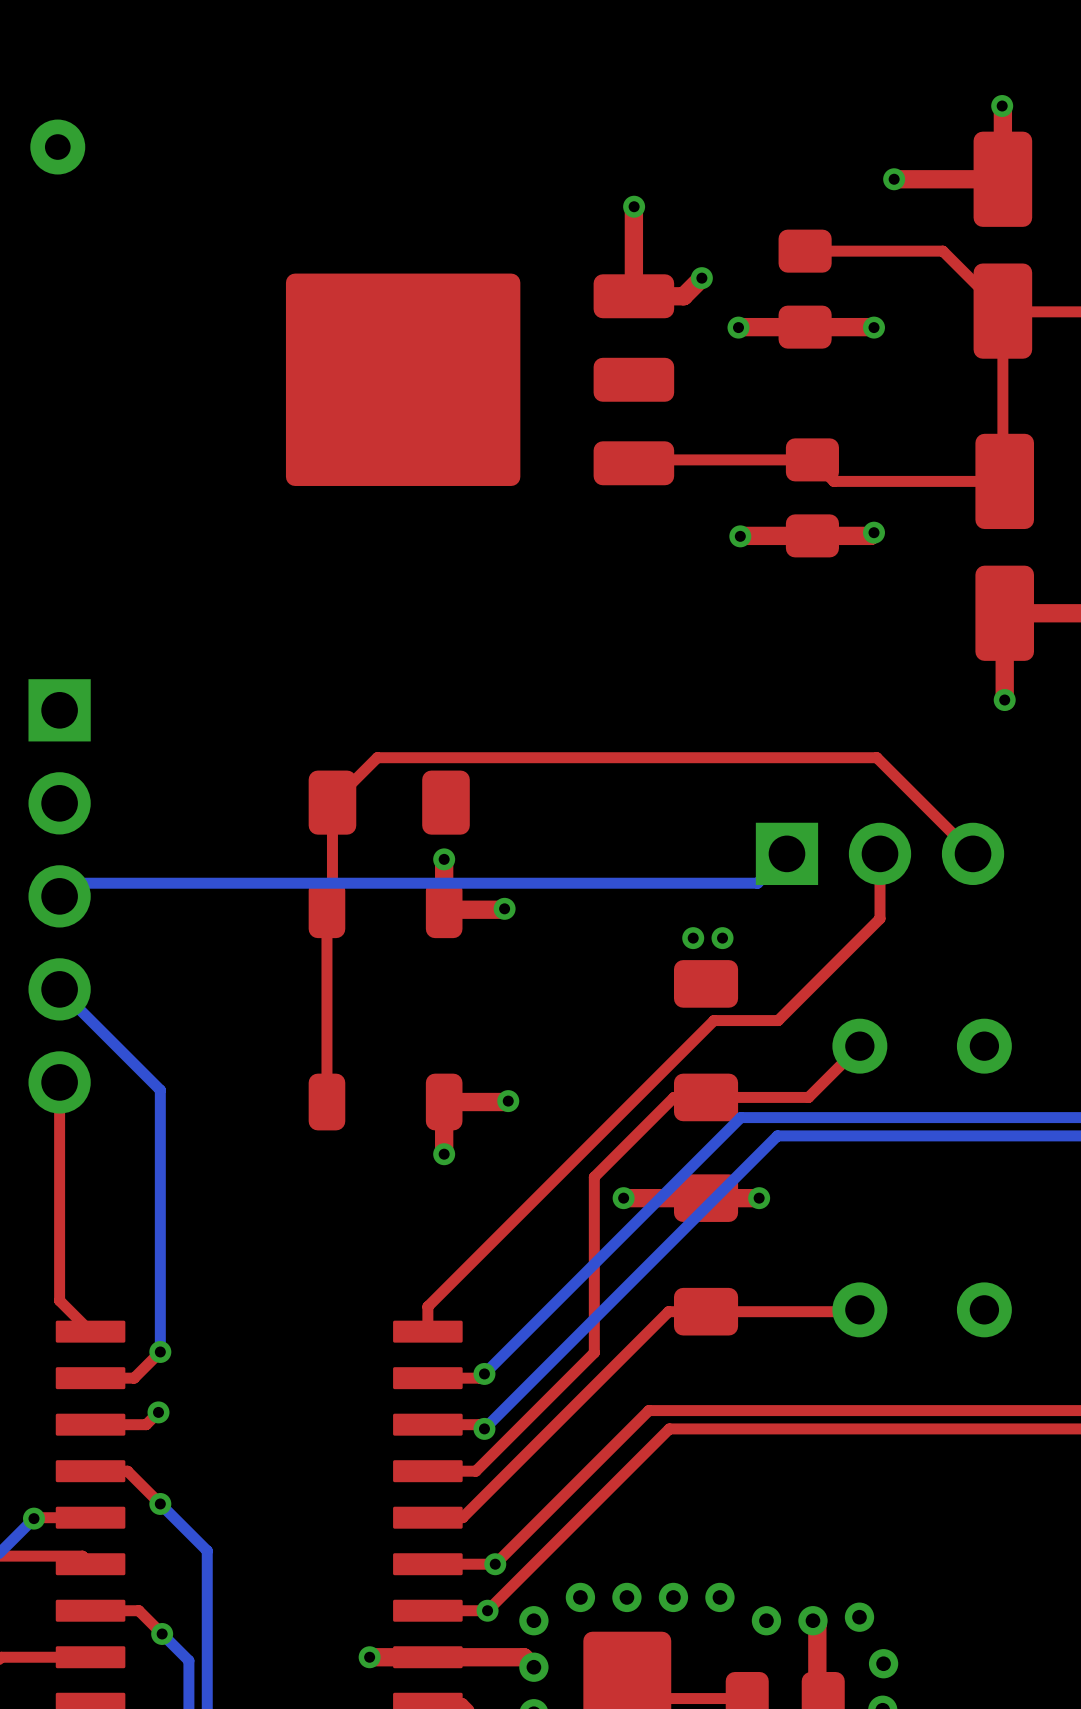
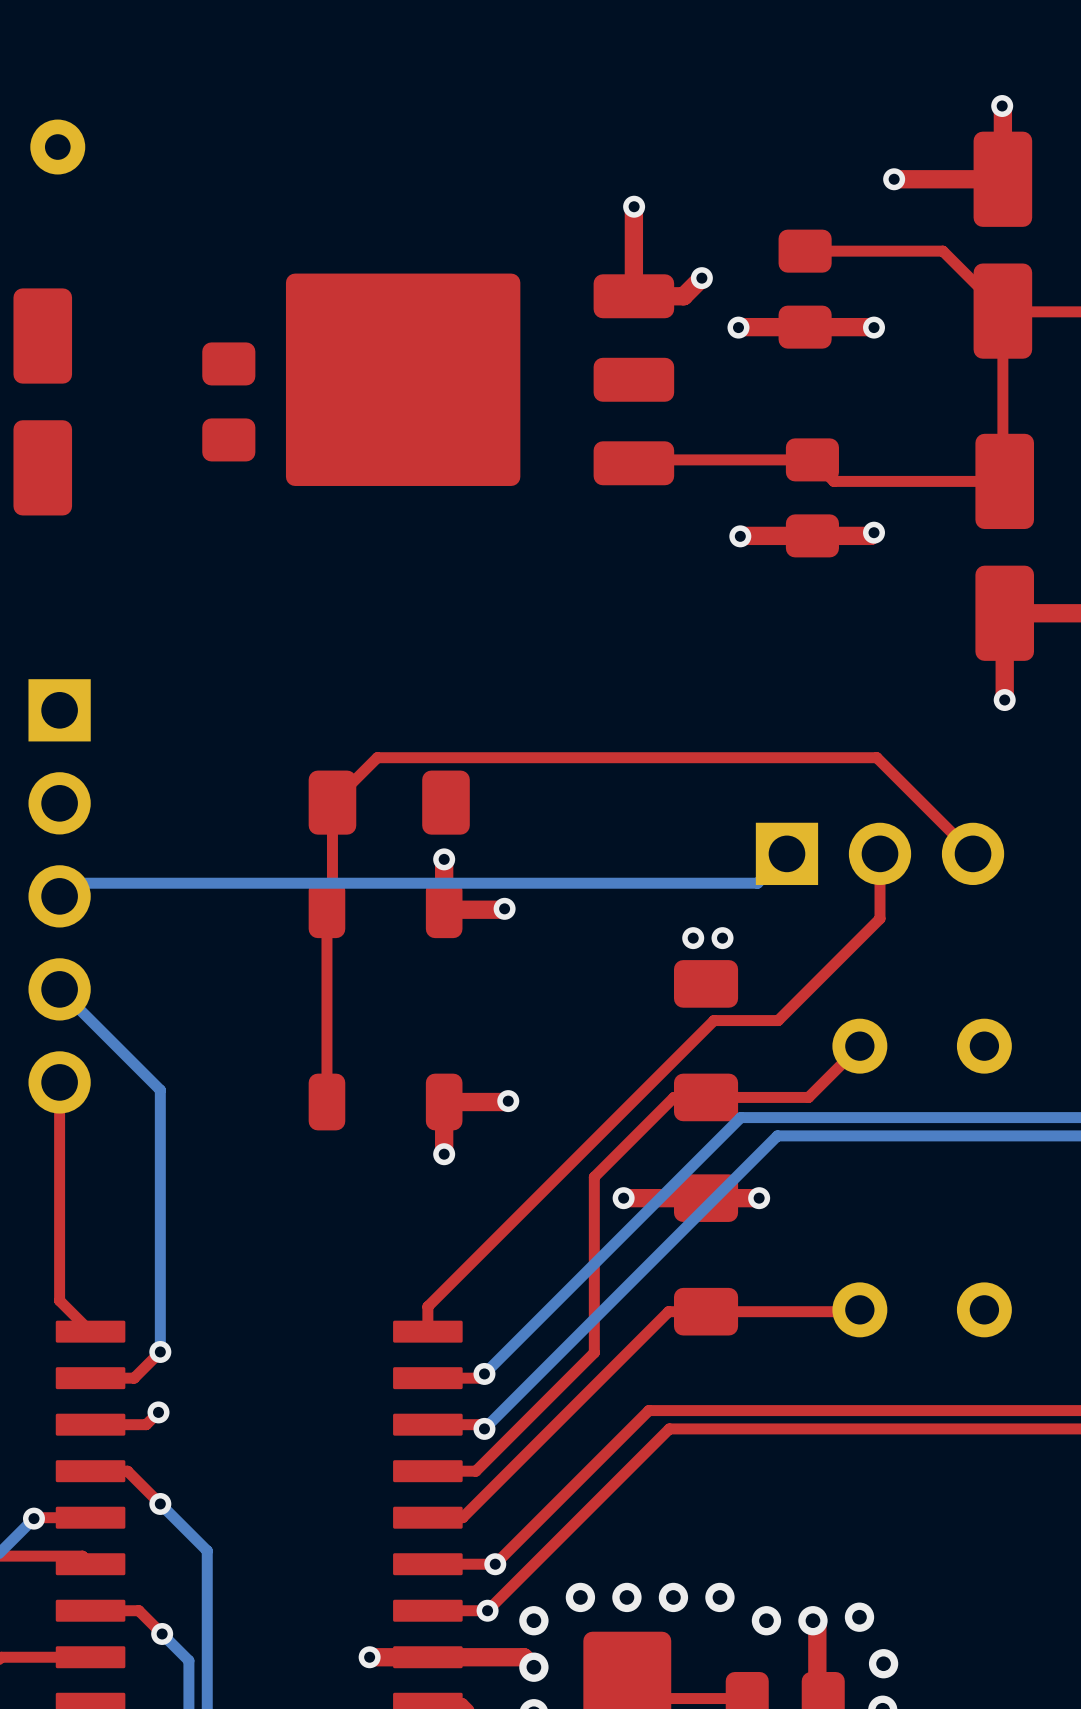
part: none -> (42, 401)
part: none -> (228, 401)

